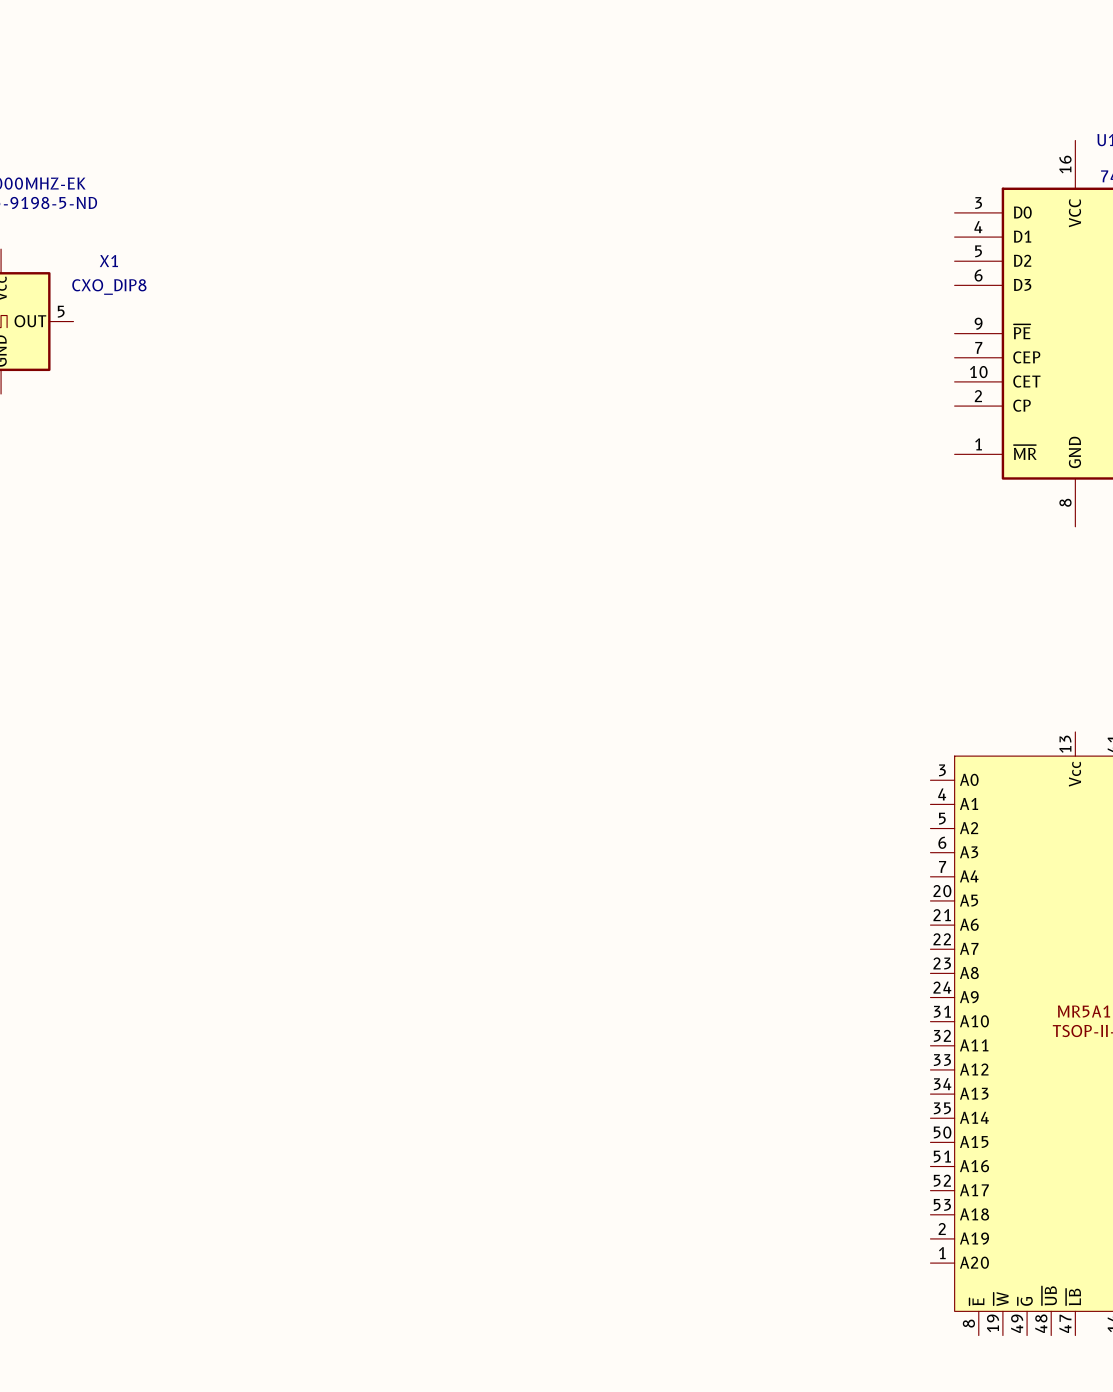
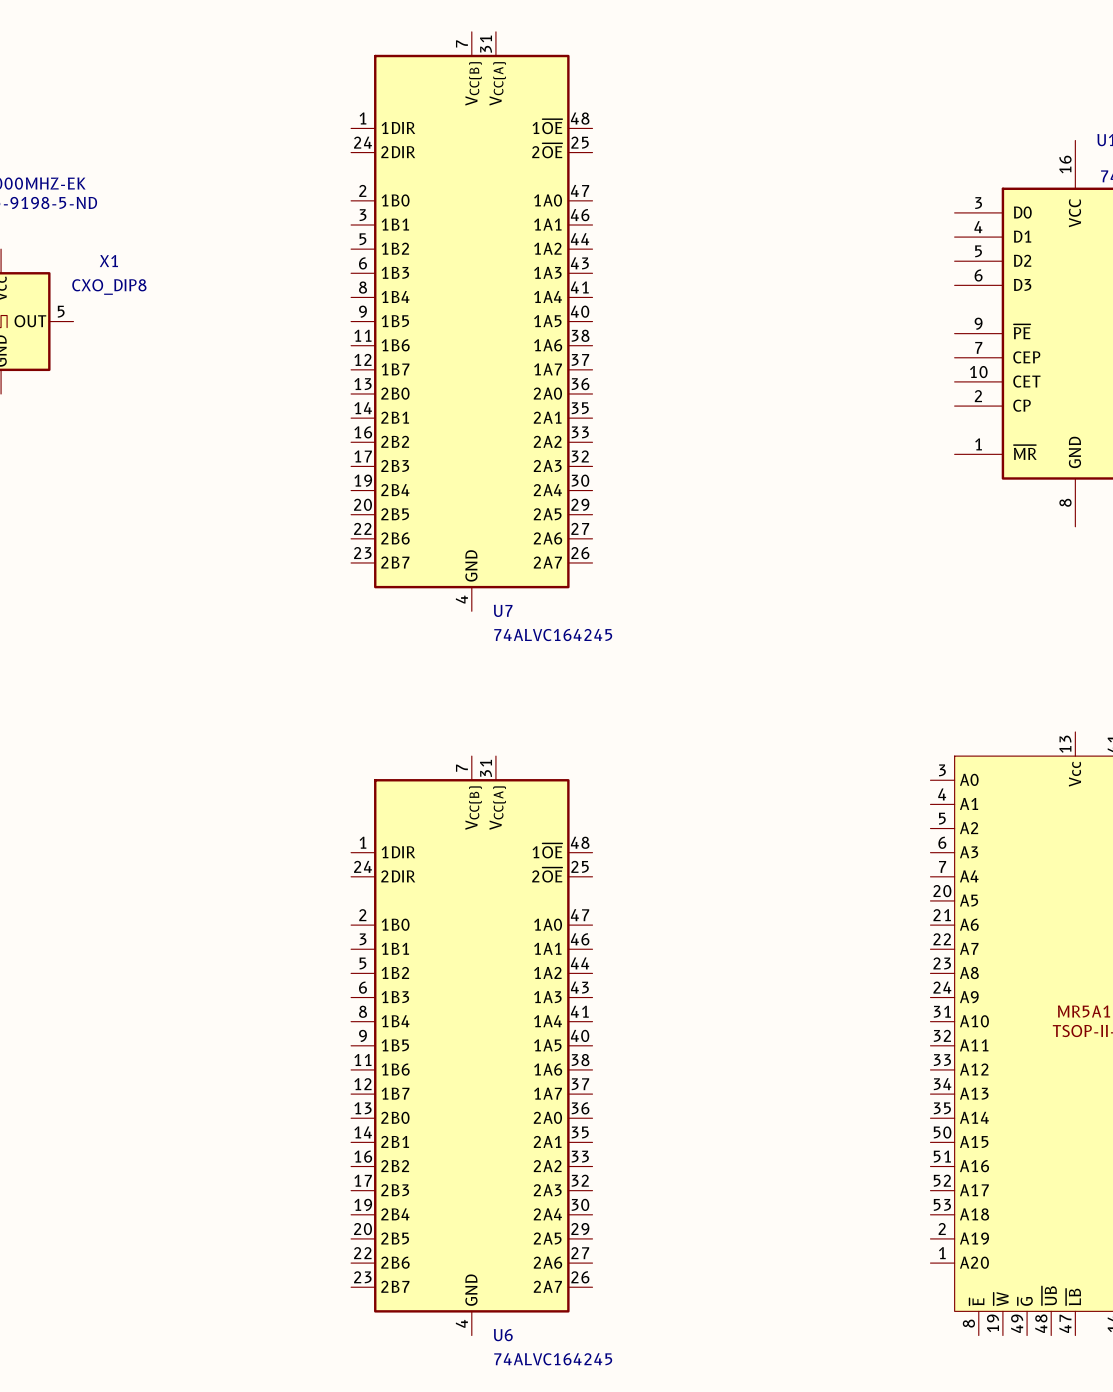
U7: none -> 74ALVC164245 (471, 321)
U6: none -> 74ALVC164245 (471, 1045)

